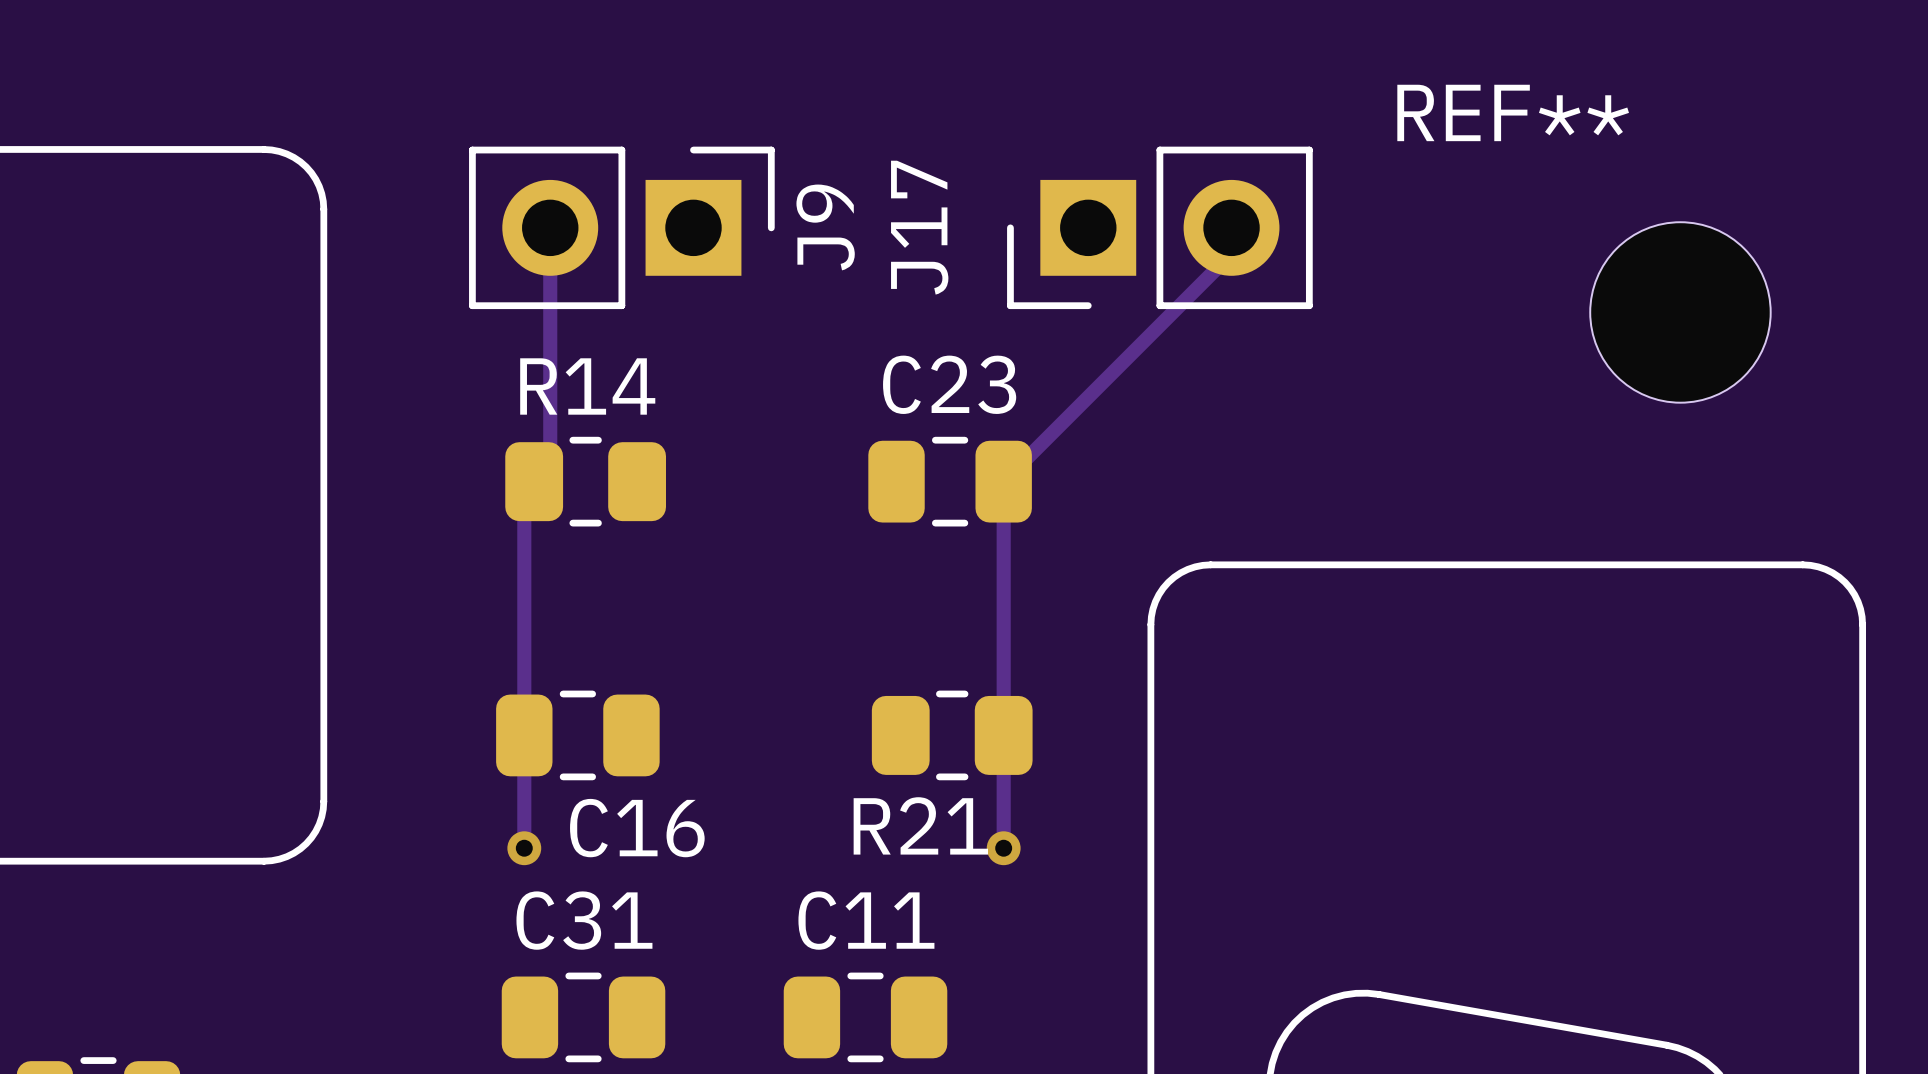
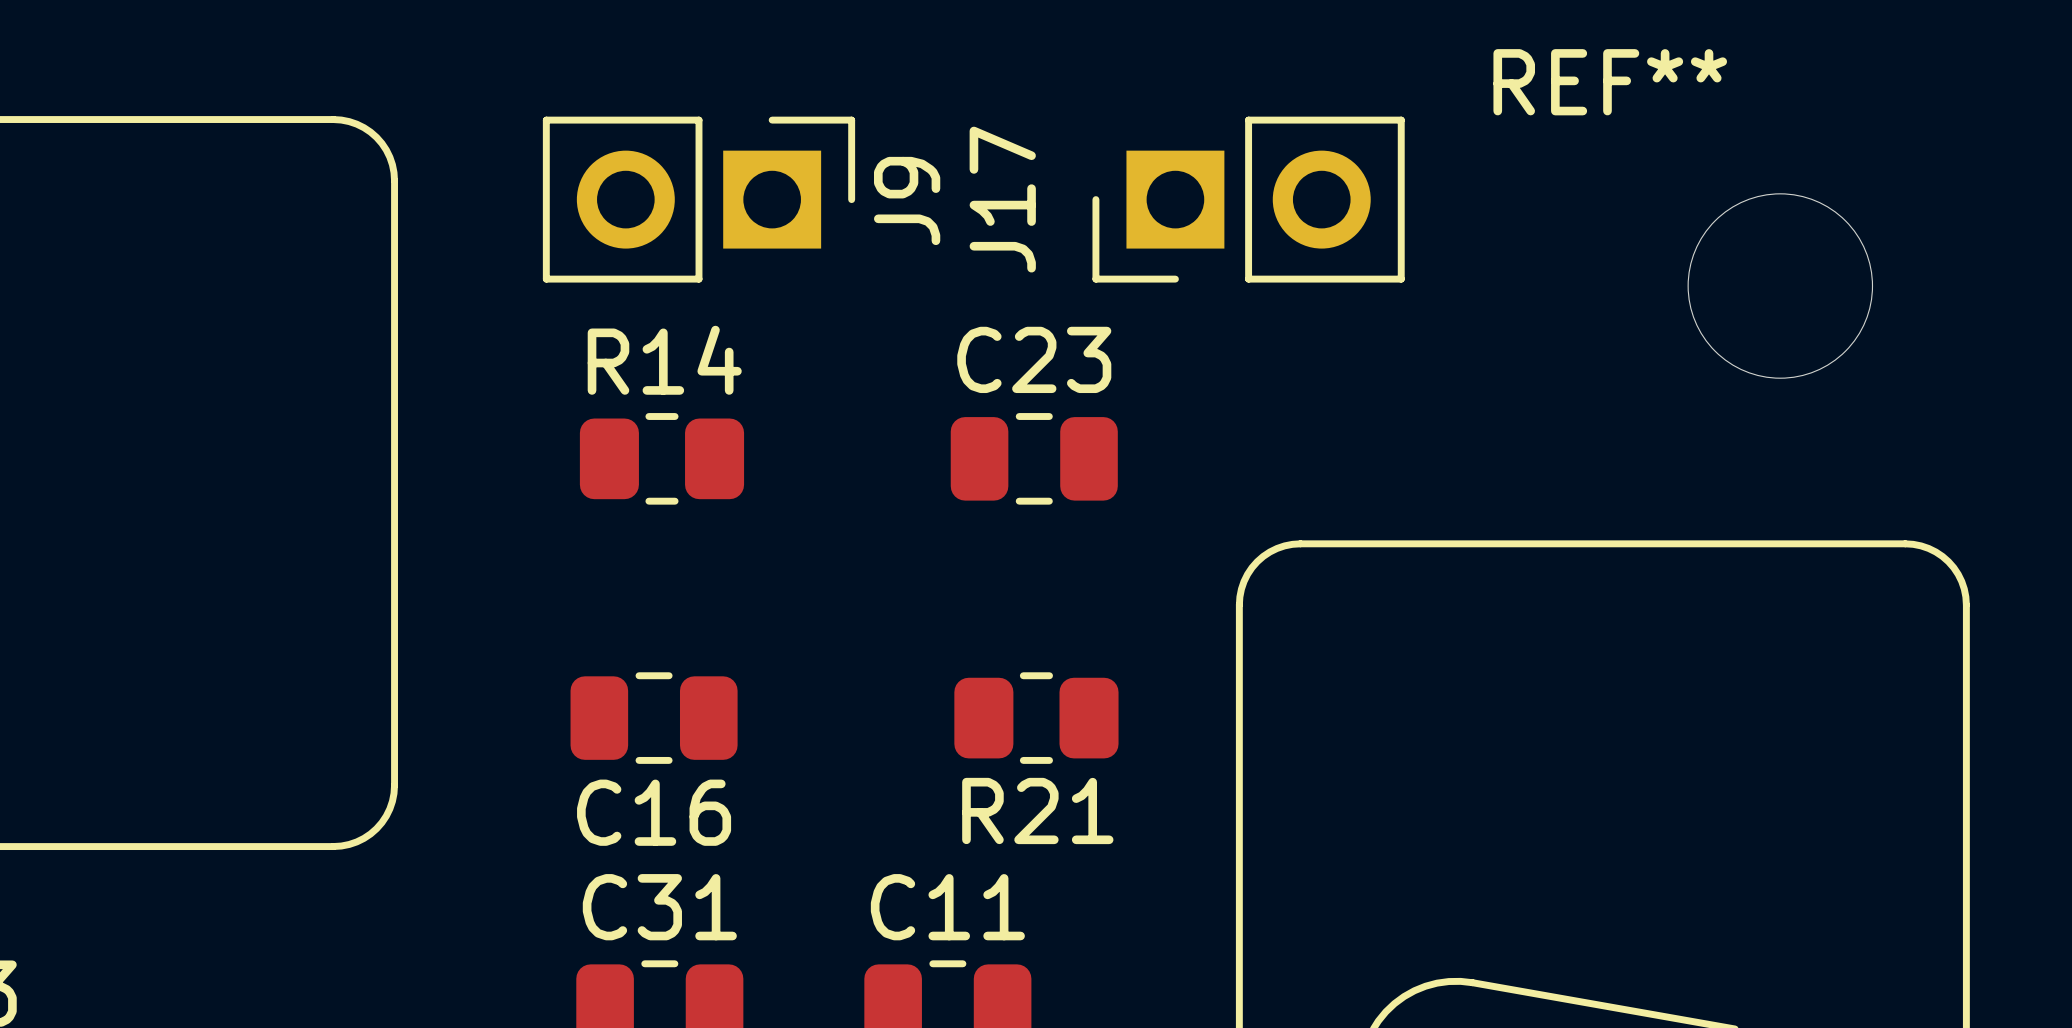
track: (550, 227) (550, 465) (524, 491) (524, 848) -> none
track: (1231, 227) (1231, 253) (1003, 481) (1003, 848) -> none
R21 name position: R21 (920, 825) -> R21 (1037, 810)
C16 name position: C16 (637, 828) -> C16 (654, 812)
via: (524, 848) -> none
via: (1003, 848) -> none

